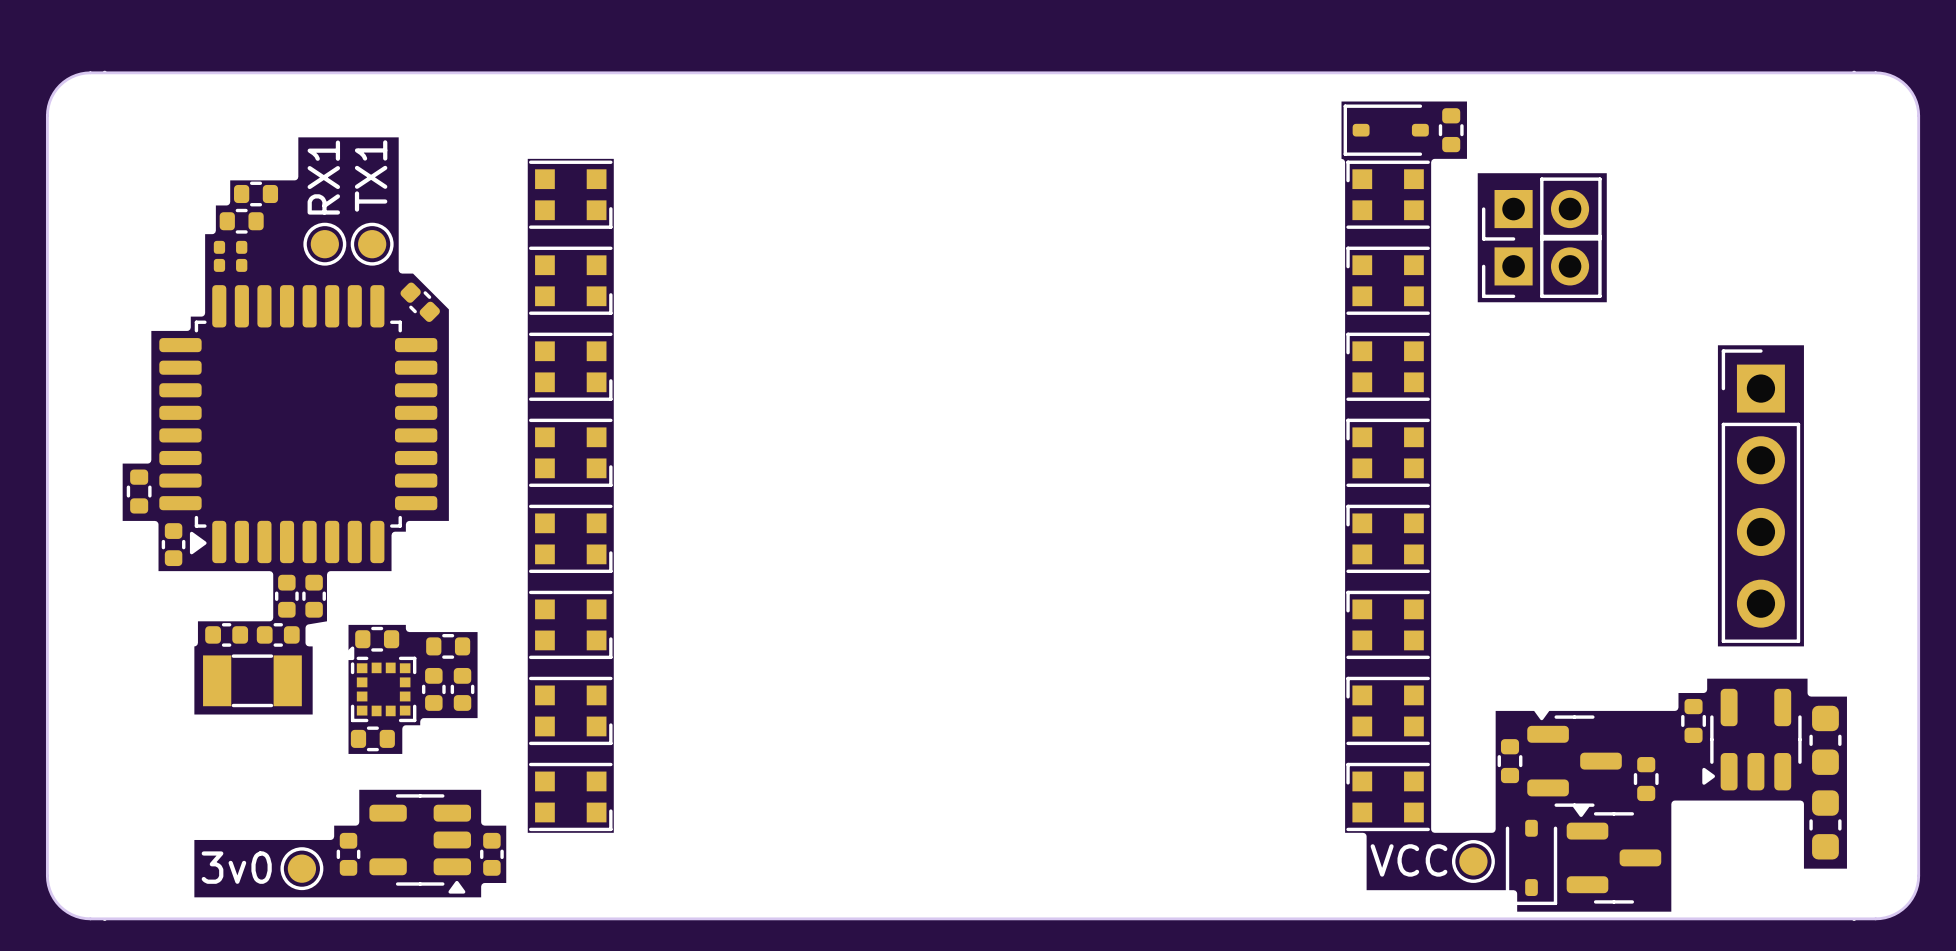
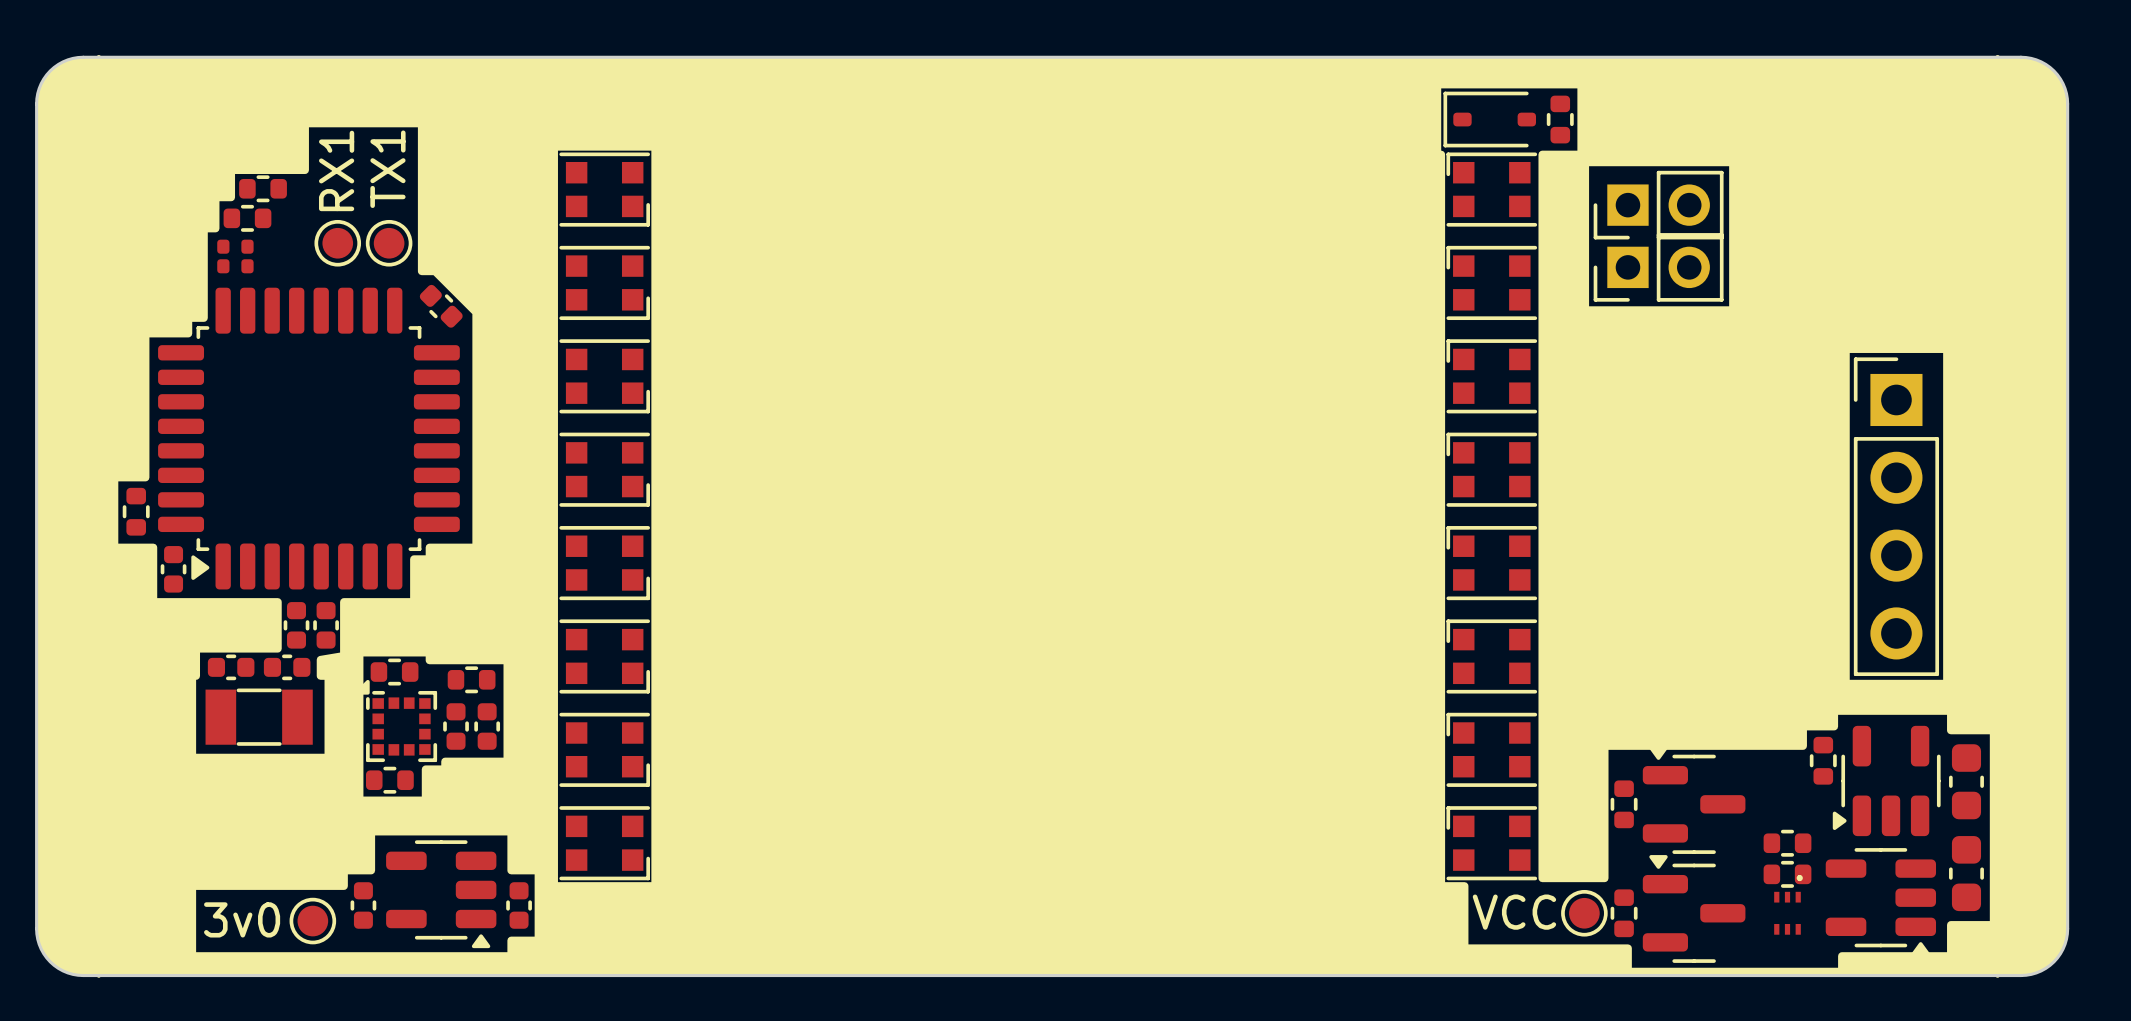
drawing shape: [47, 72, 1919, 919] -> [36, 57, 2068, 976]
part rotation: 0° (1646, 779) -> 90° clockwise (1787, 843)
part: none -> (1787, 874)
part: none -> (1880, 901)
part position: (1613, 853) -> (1694, 908)
part: none -> (1788, 904)
part: none -> (1624, 913)
part: (1531, 862) -> none

